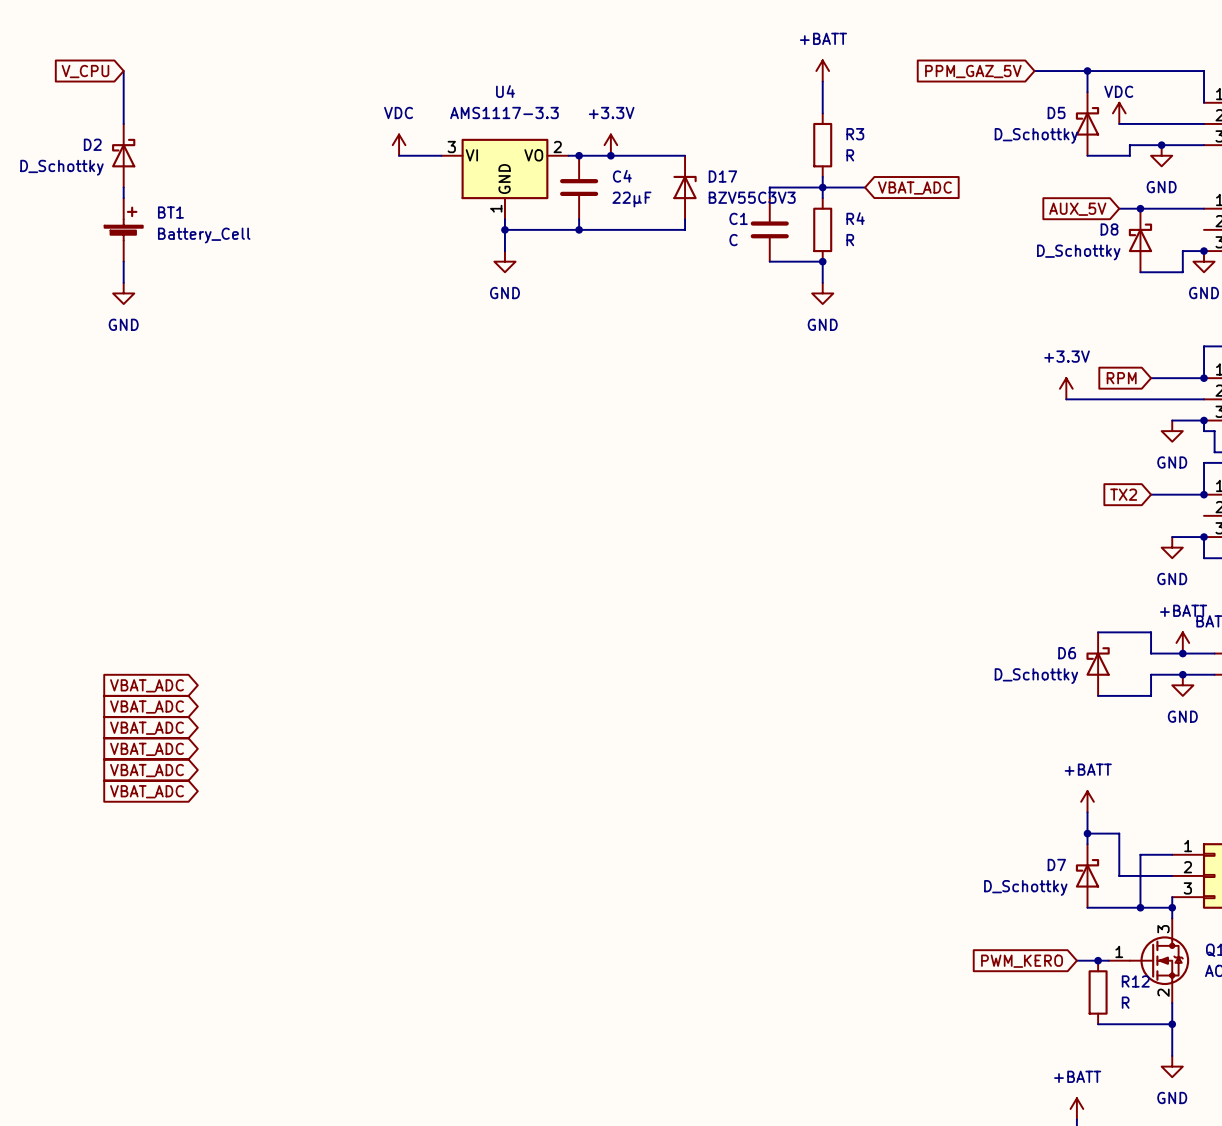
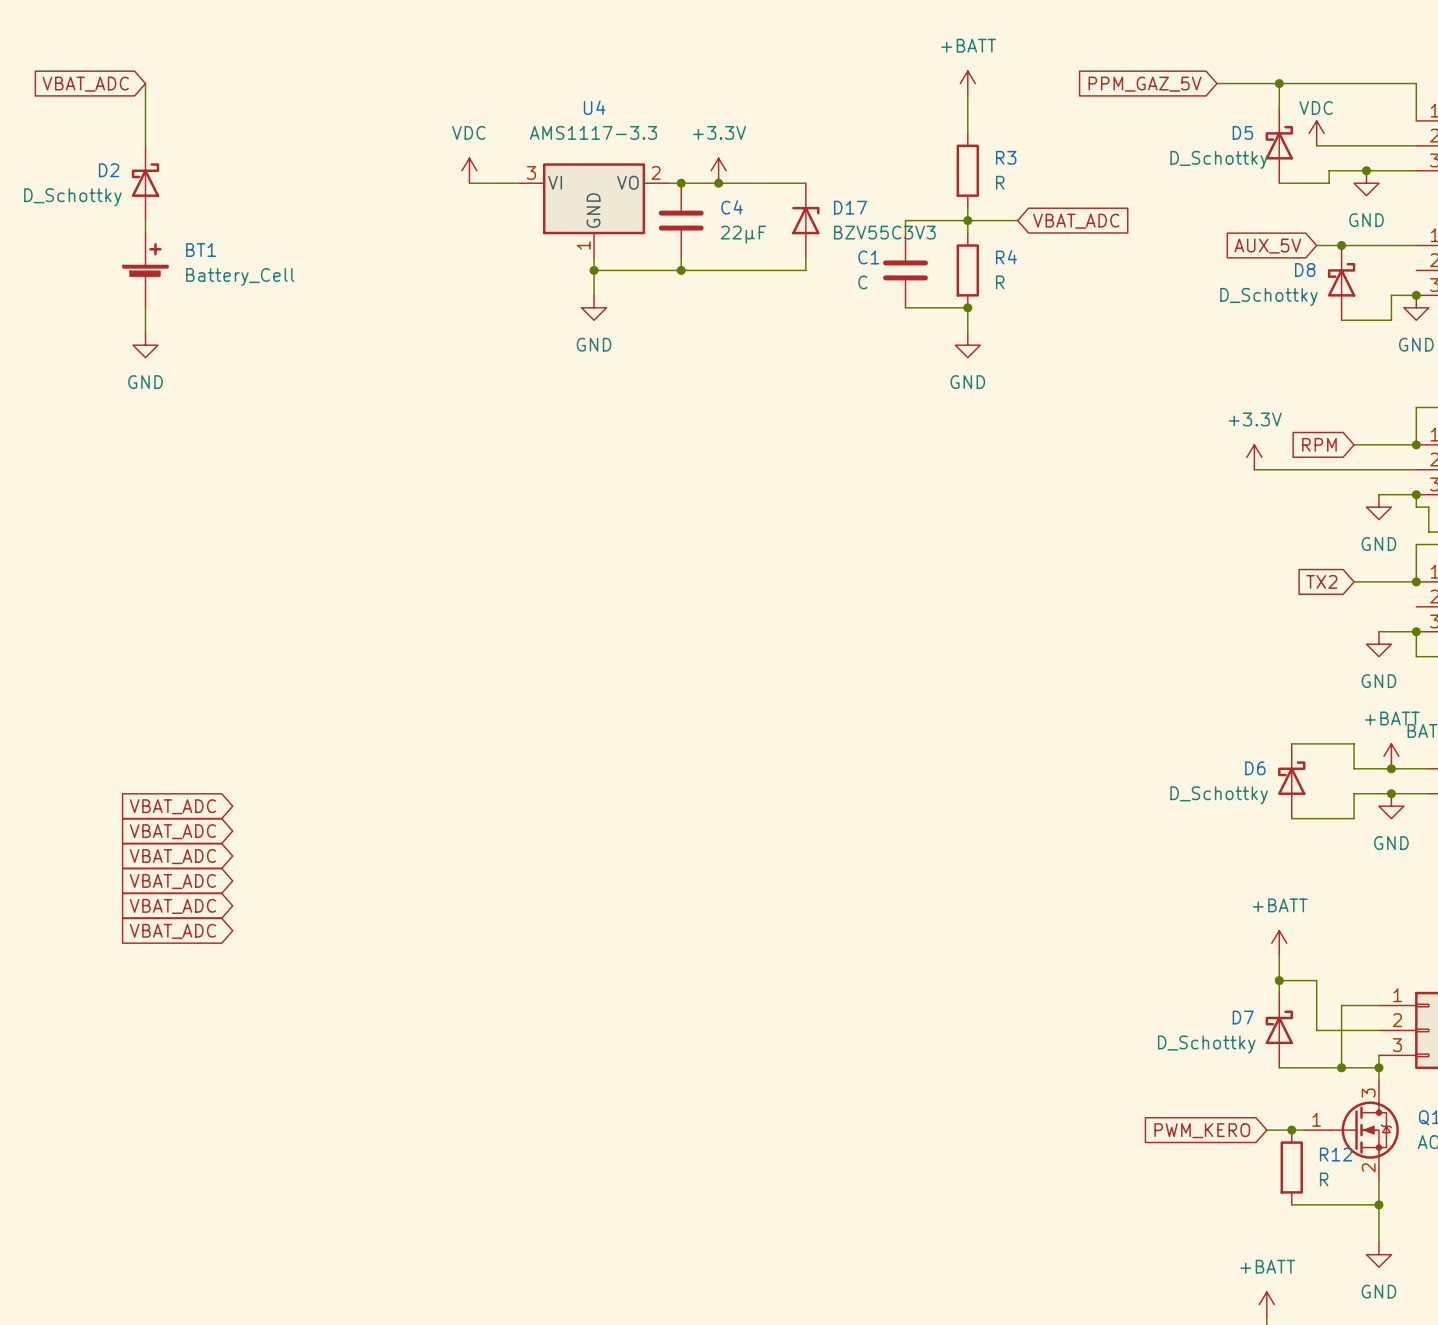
global label: V_CPU (85, 71) -> VBAT_ADC (85, 84)

